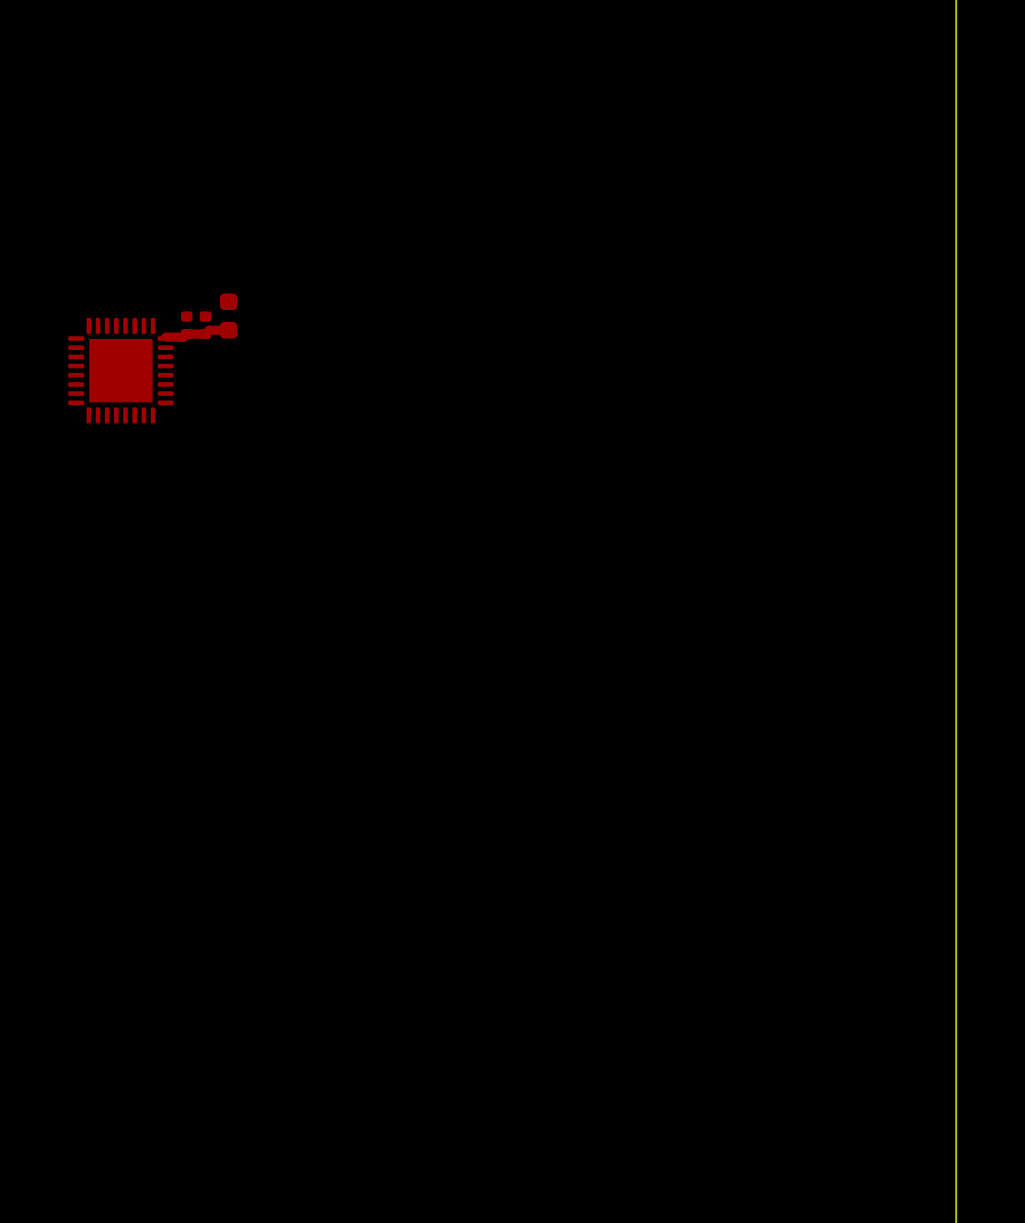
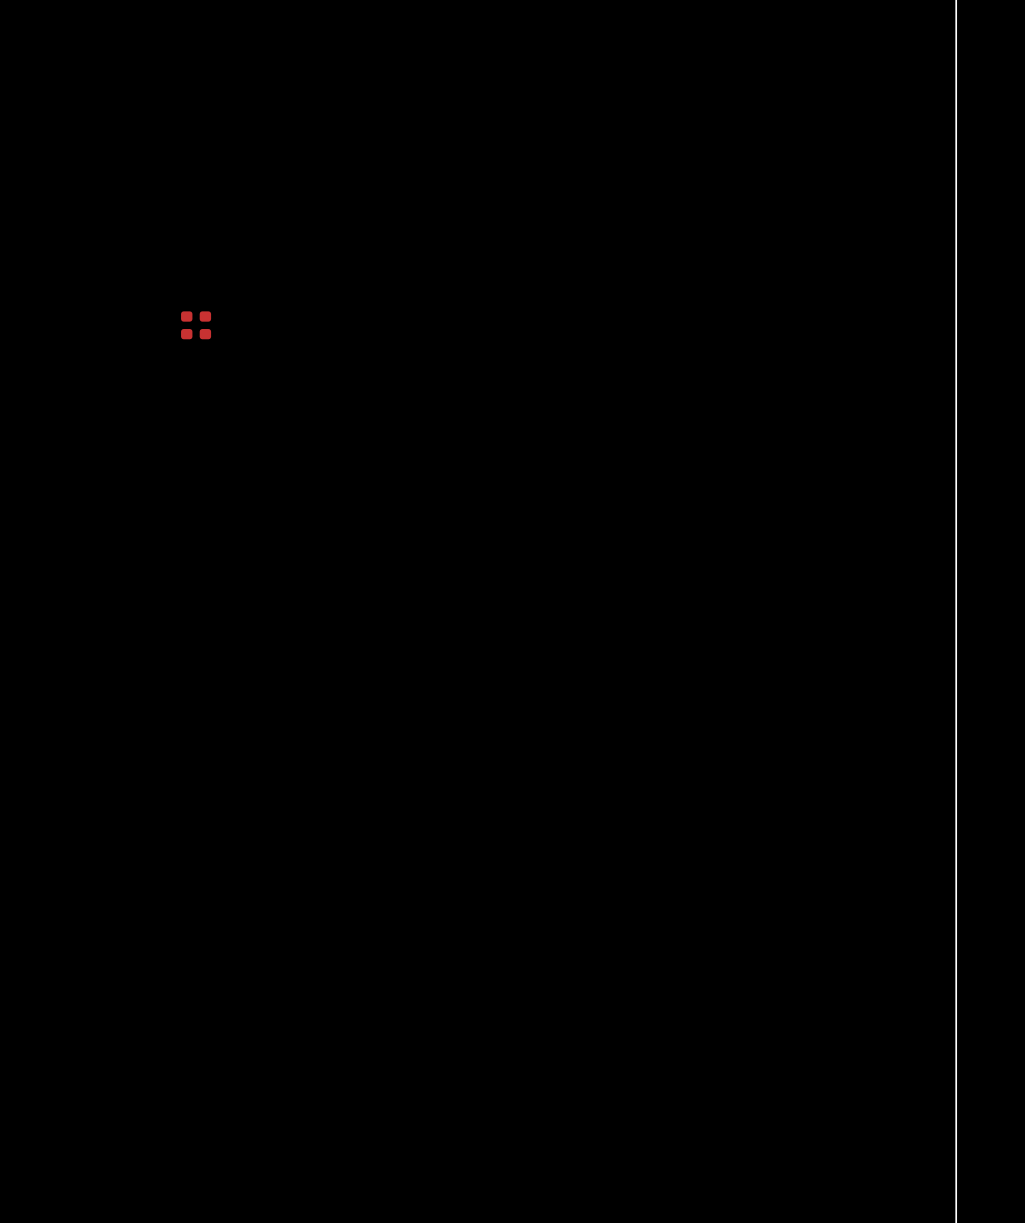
part: (228, 316) -> none
top track: (228, 330) (209, 330) (205, 334) (165, 337) -> none
part: (120, 370) -> none

